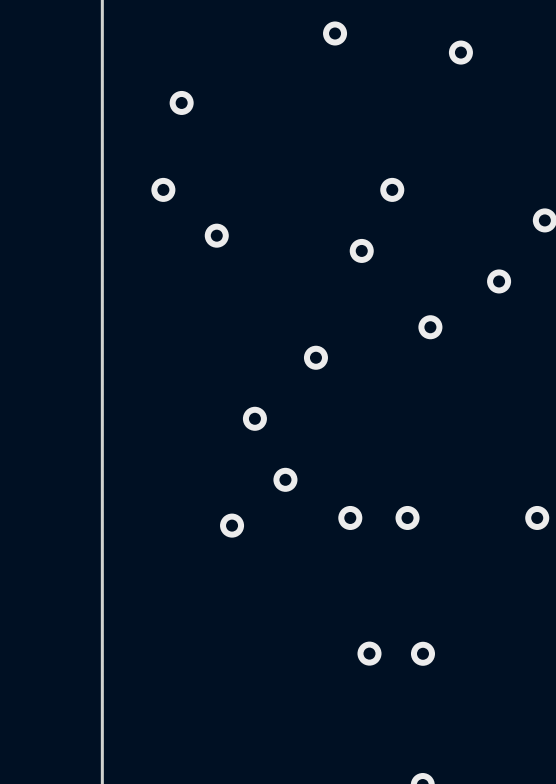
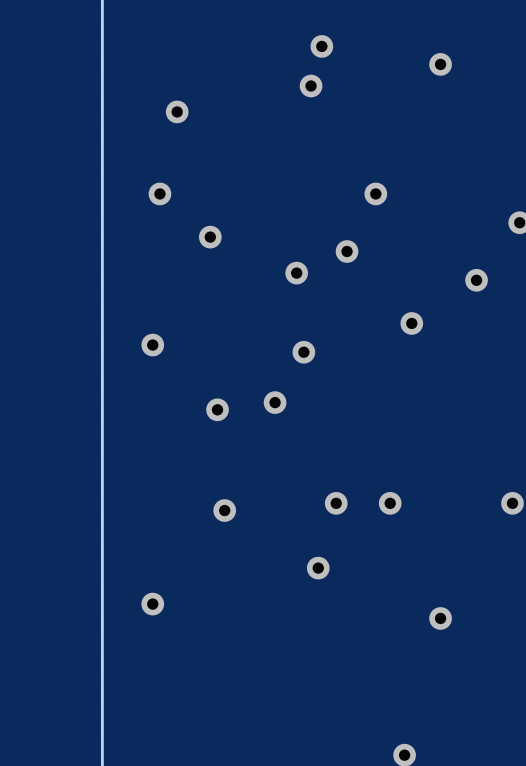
via: none -> (311, 86)
via: none -> (296, 273)
via: none -> (152, 345)
via: none -> (275, 402)
via: none -> (217, 409)
via: (254, 418) -> none
via: (285, 479) -> none
via: none -> (318, 568)
via: none -> (152, 604)
via: (369, 653) -> none
via position: (422, 653) -> (440, 618)

